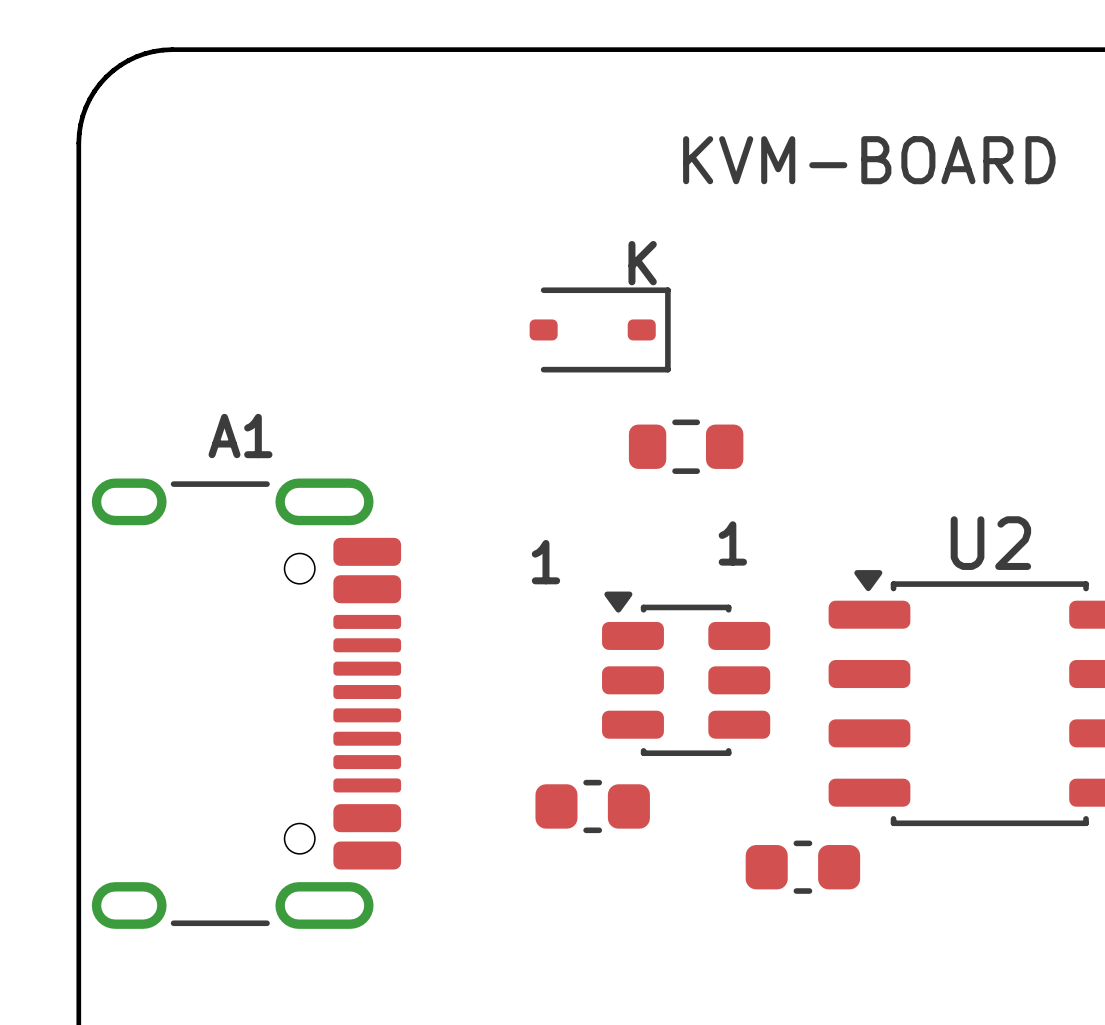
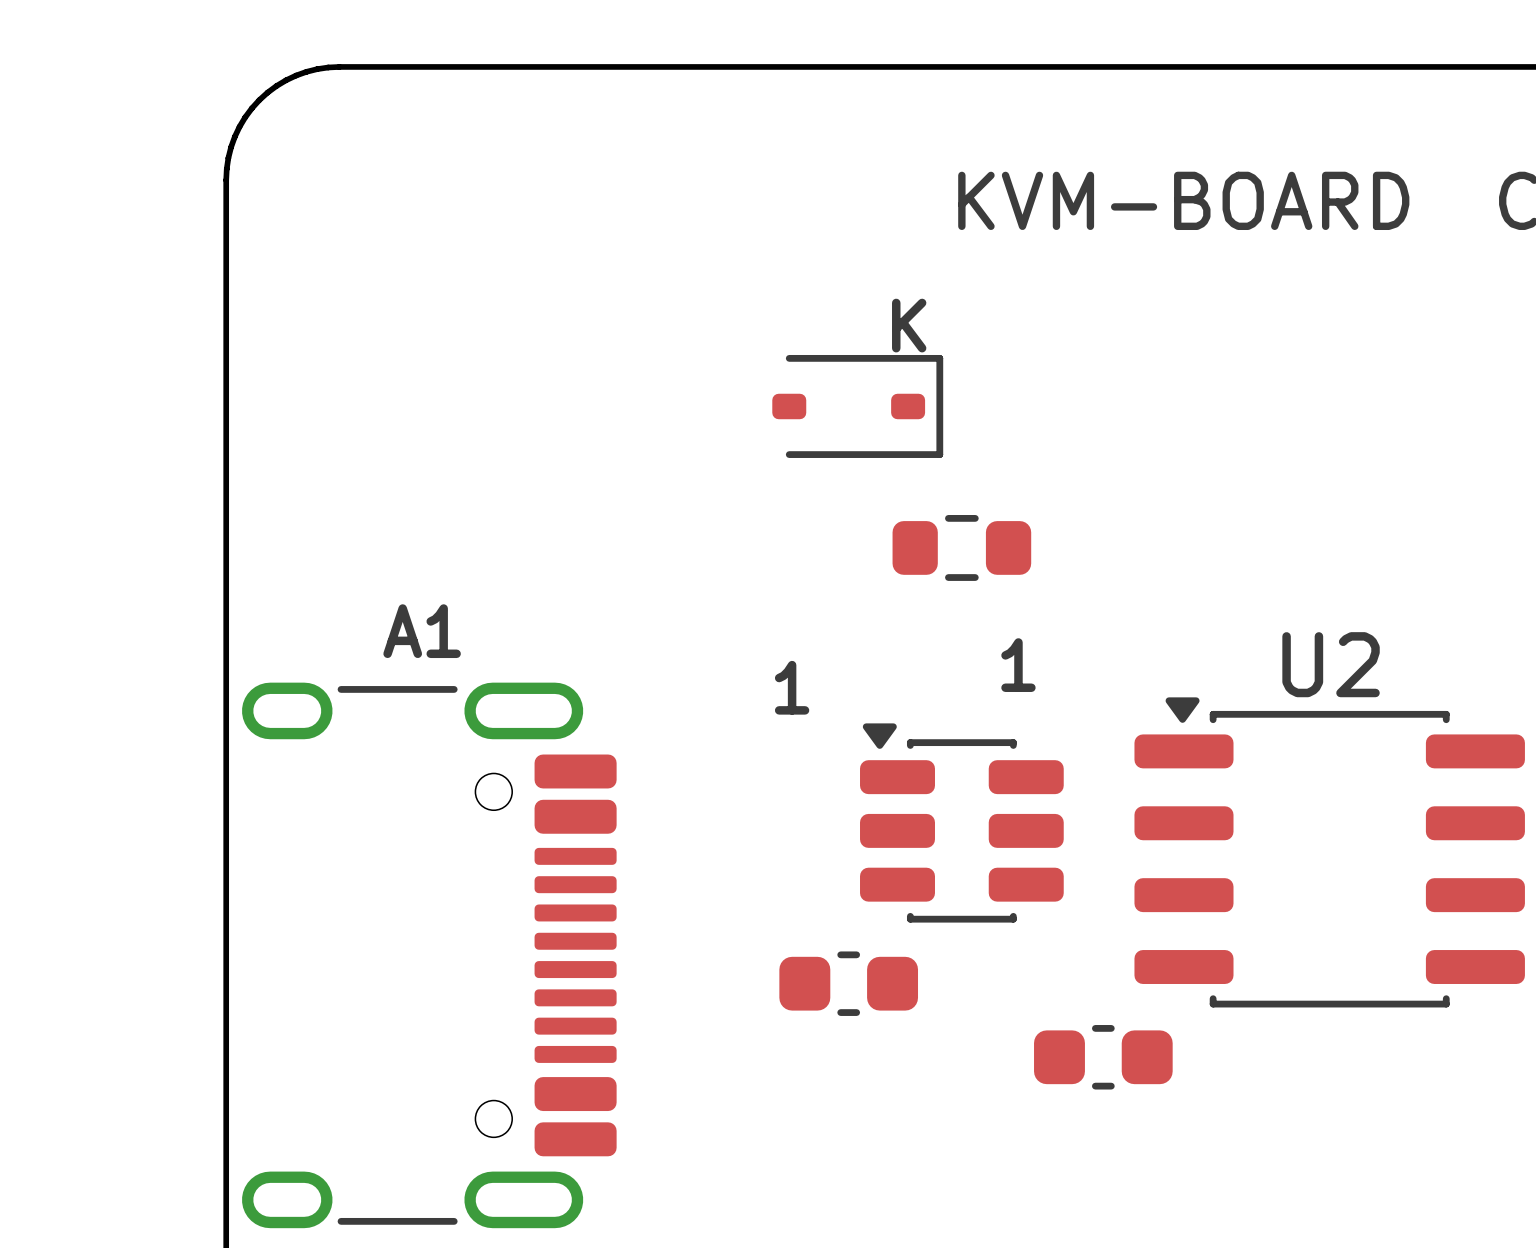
text position: A1 (240, 436) -> A1 (422, 631)
part position: (246, 703) -> (429, 955)

